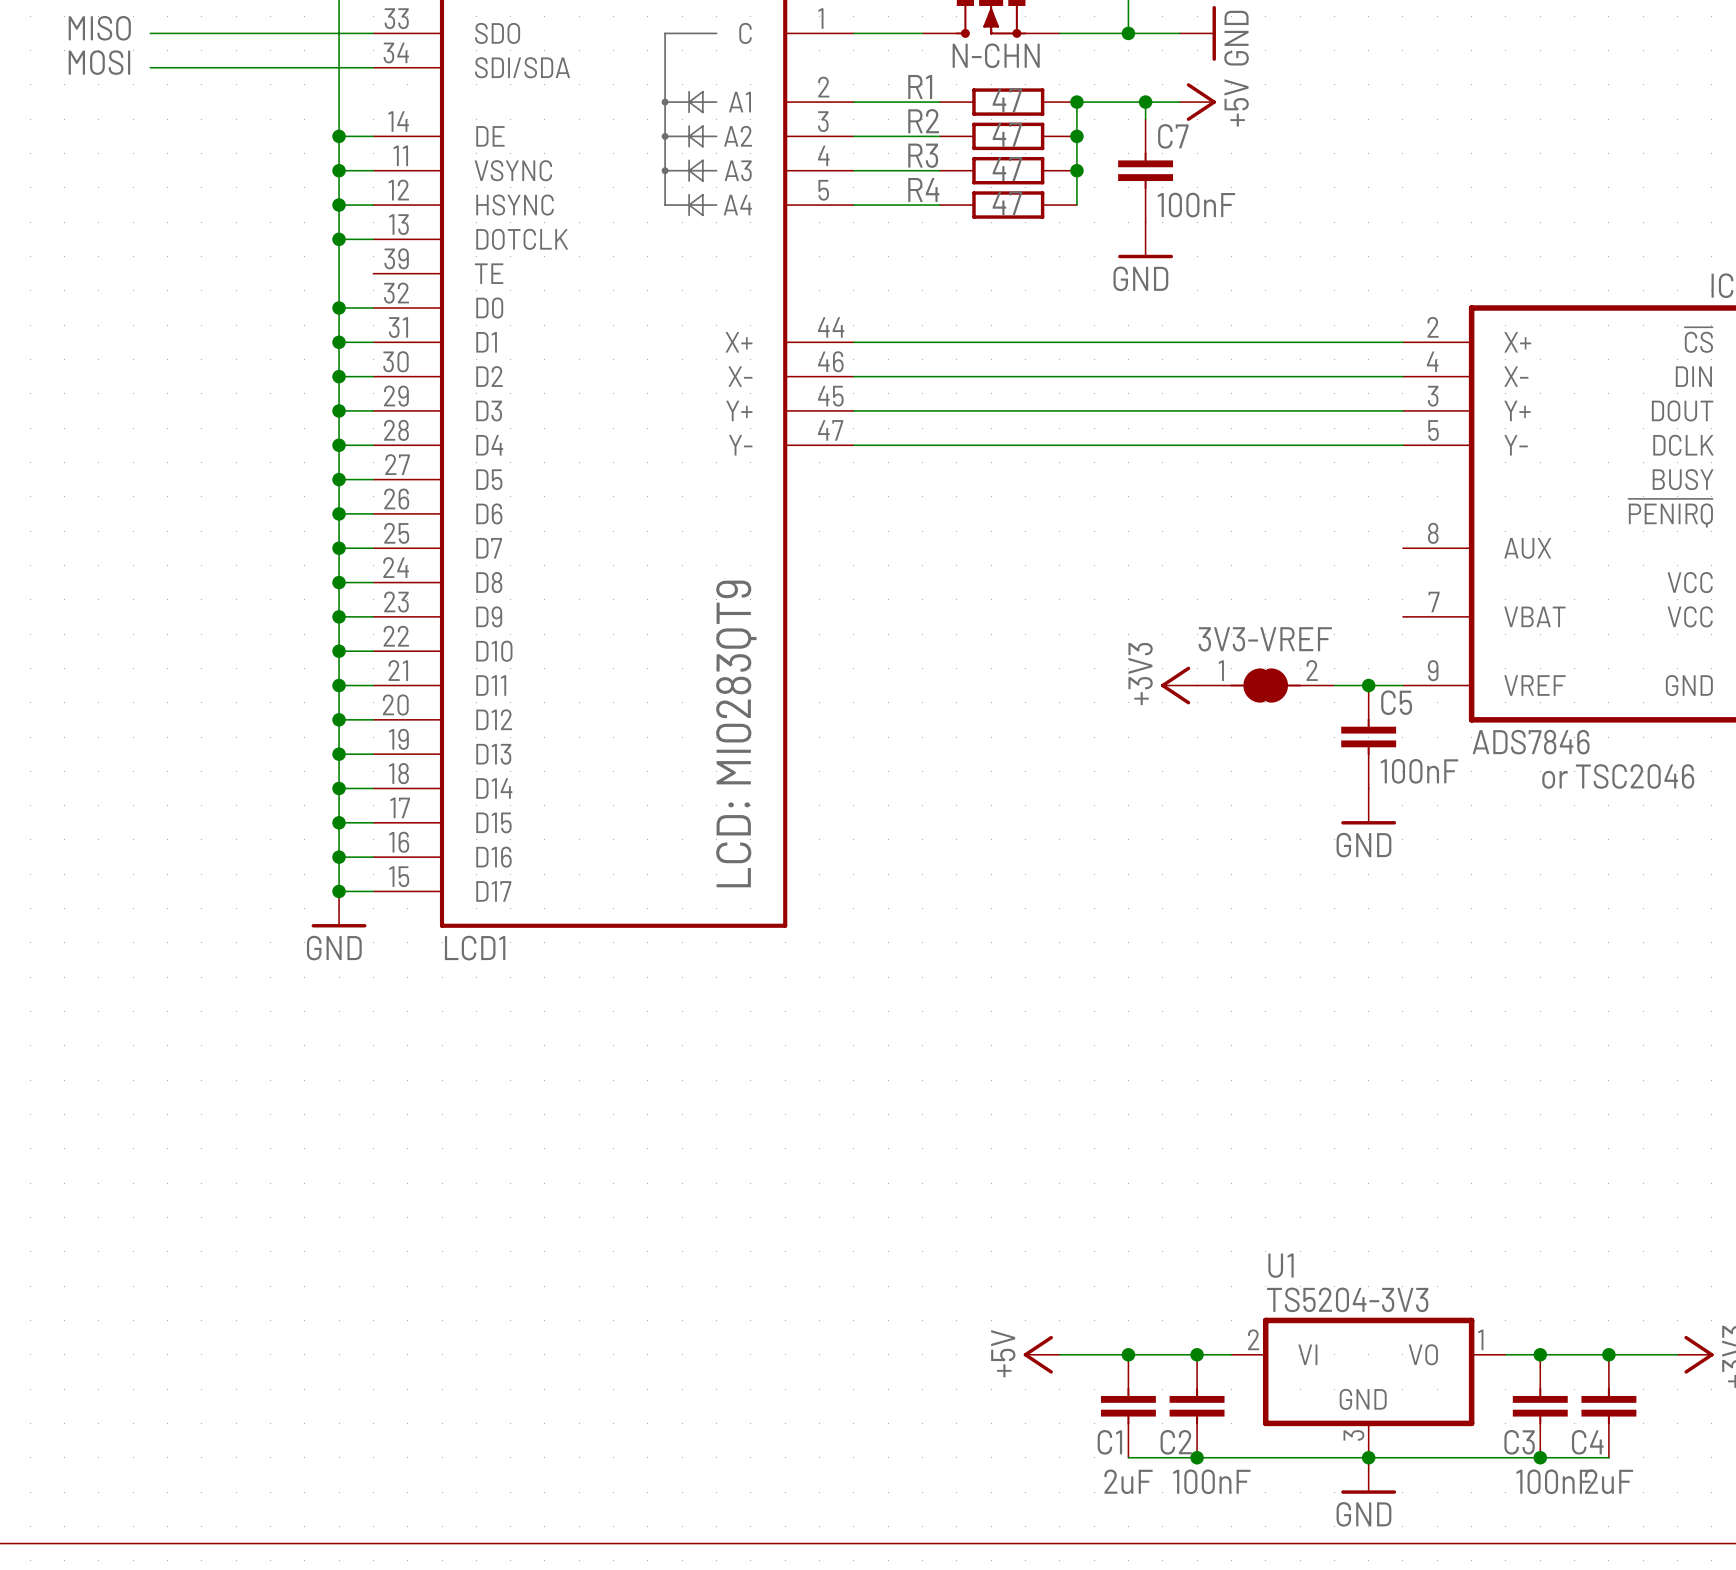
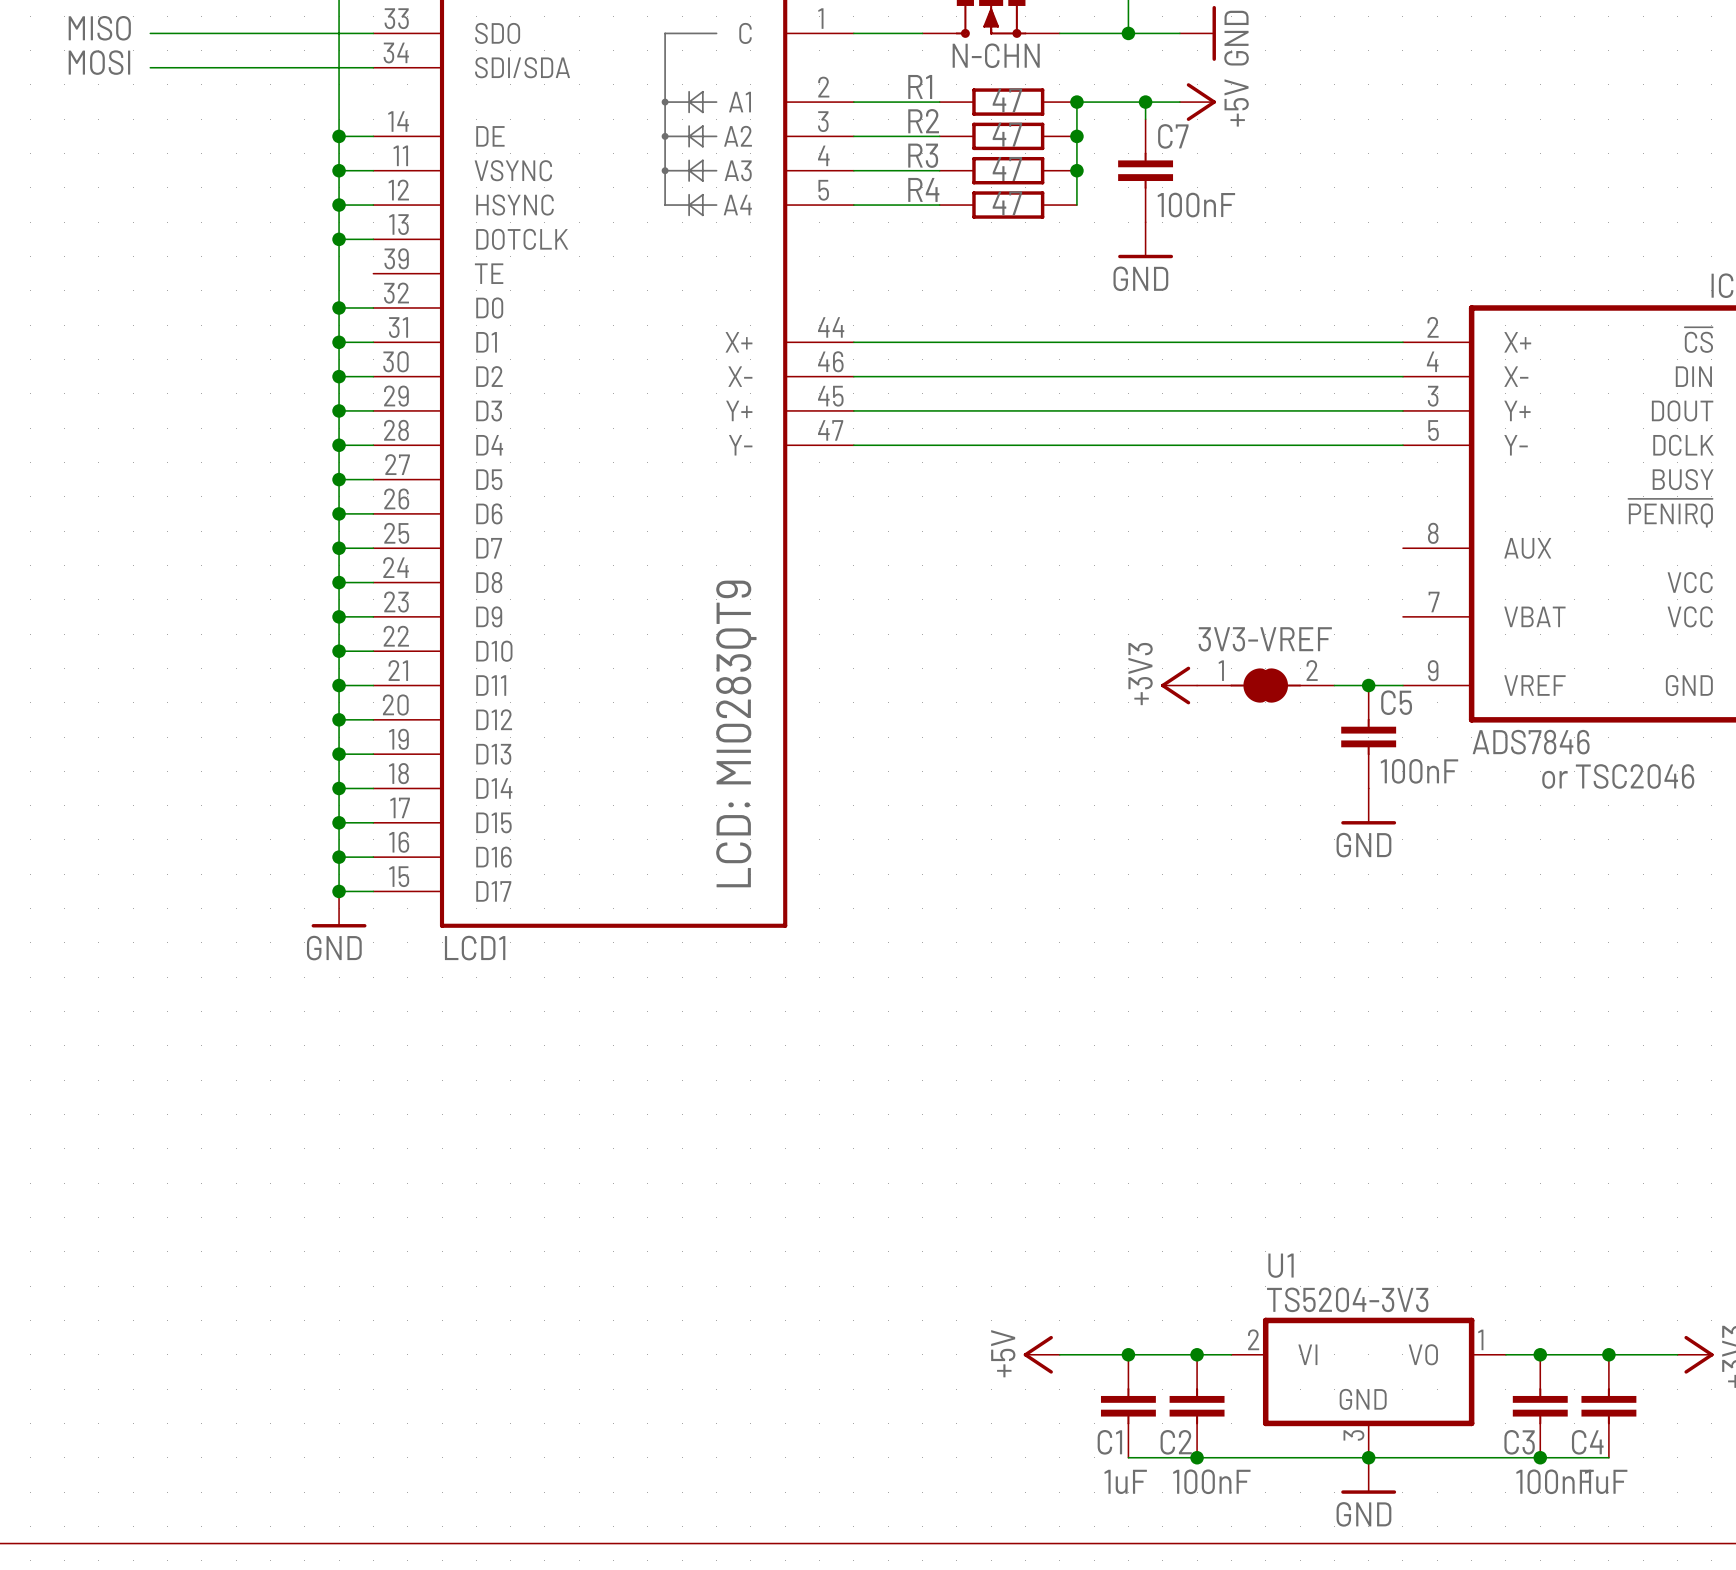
C1 value: 2uF (1128, 1481) -> 1uF (1125, 1481)
C4 value: 2uF (1609, 1481) -> 1uF (1606, 1481)

